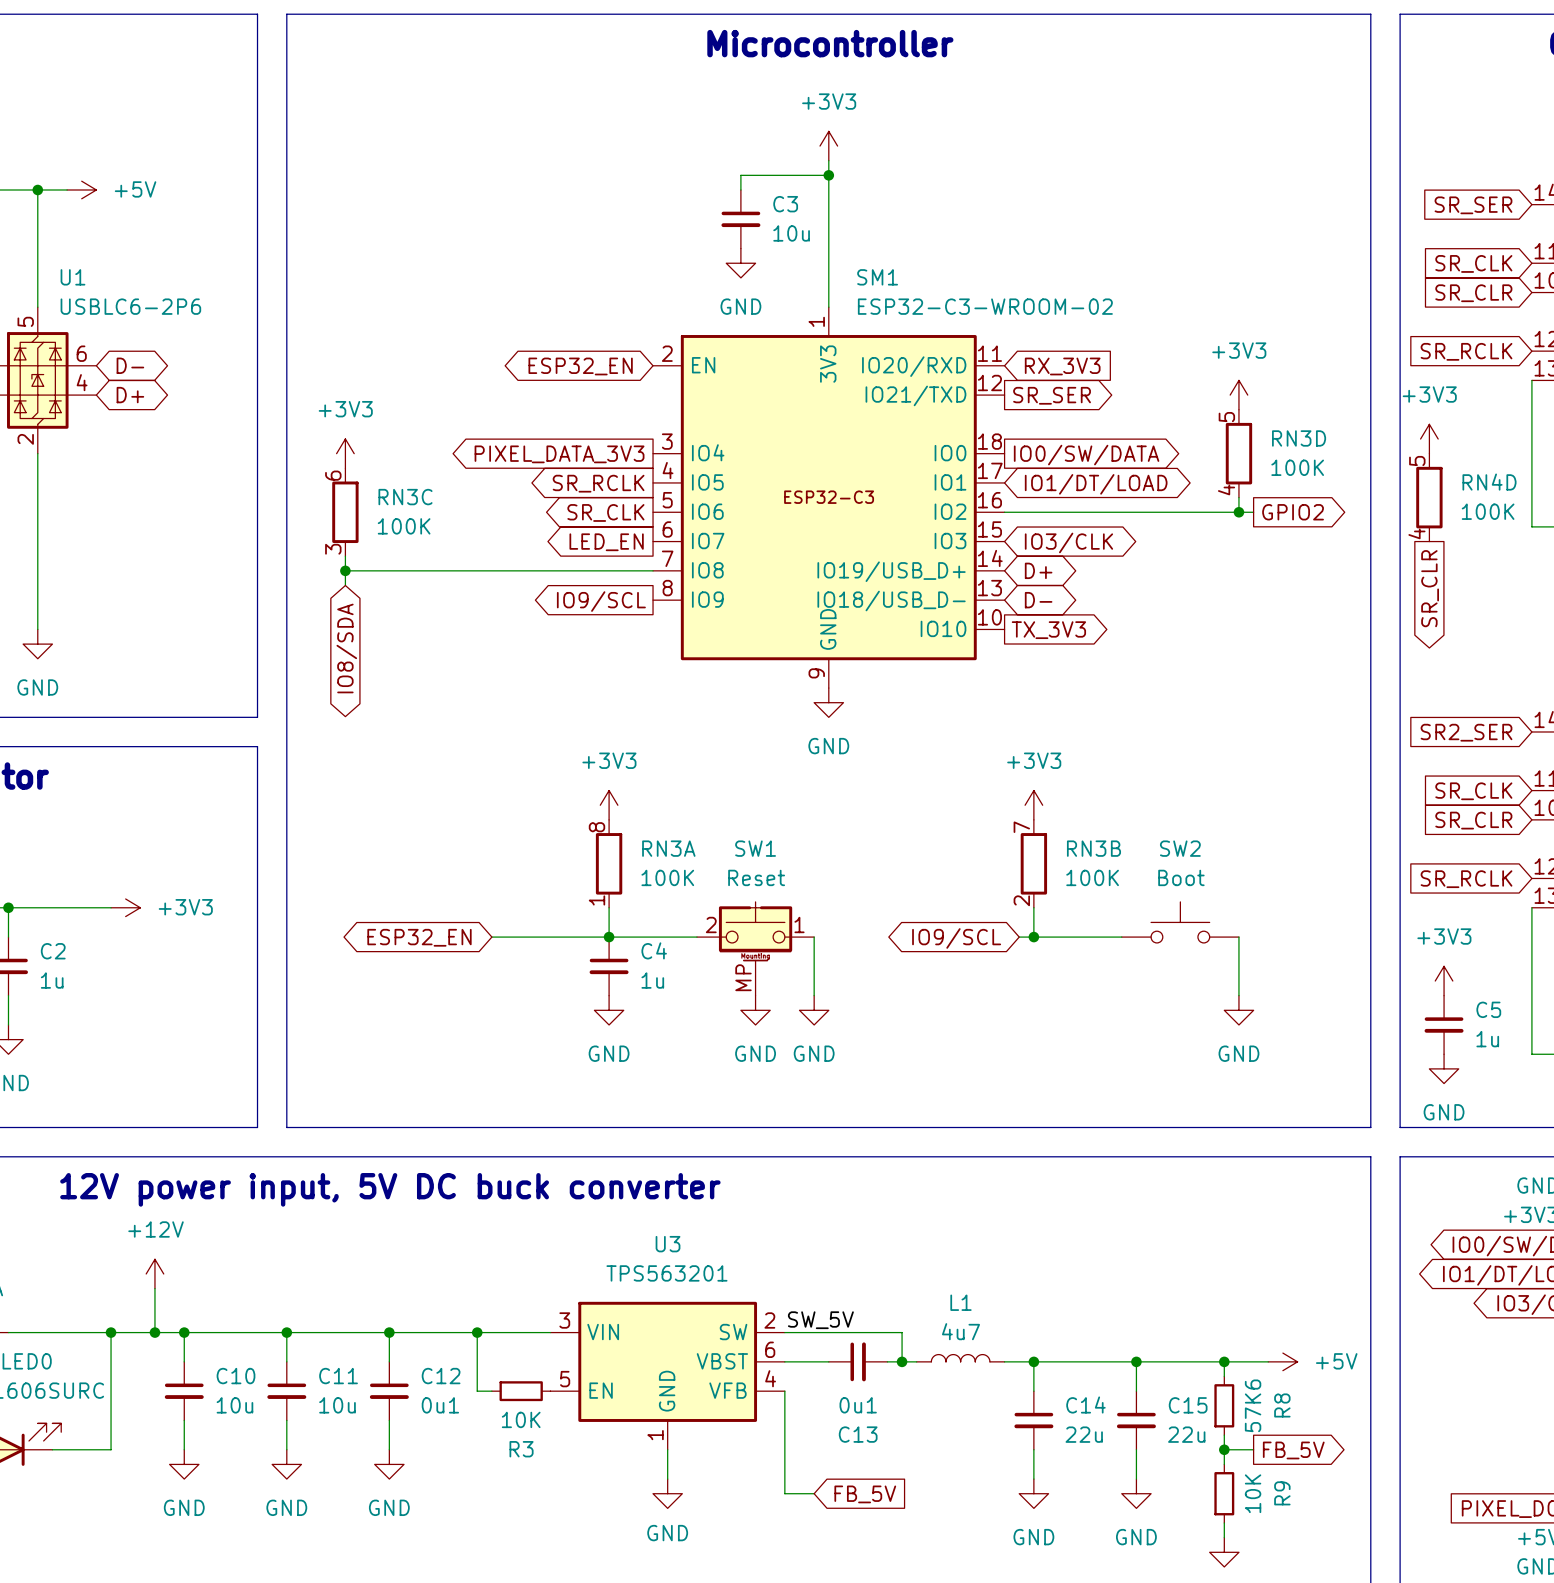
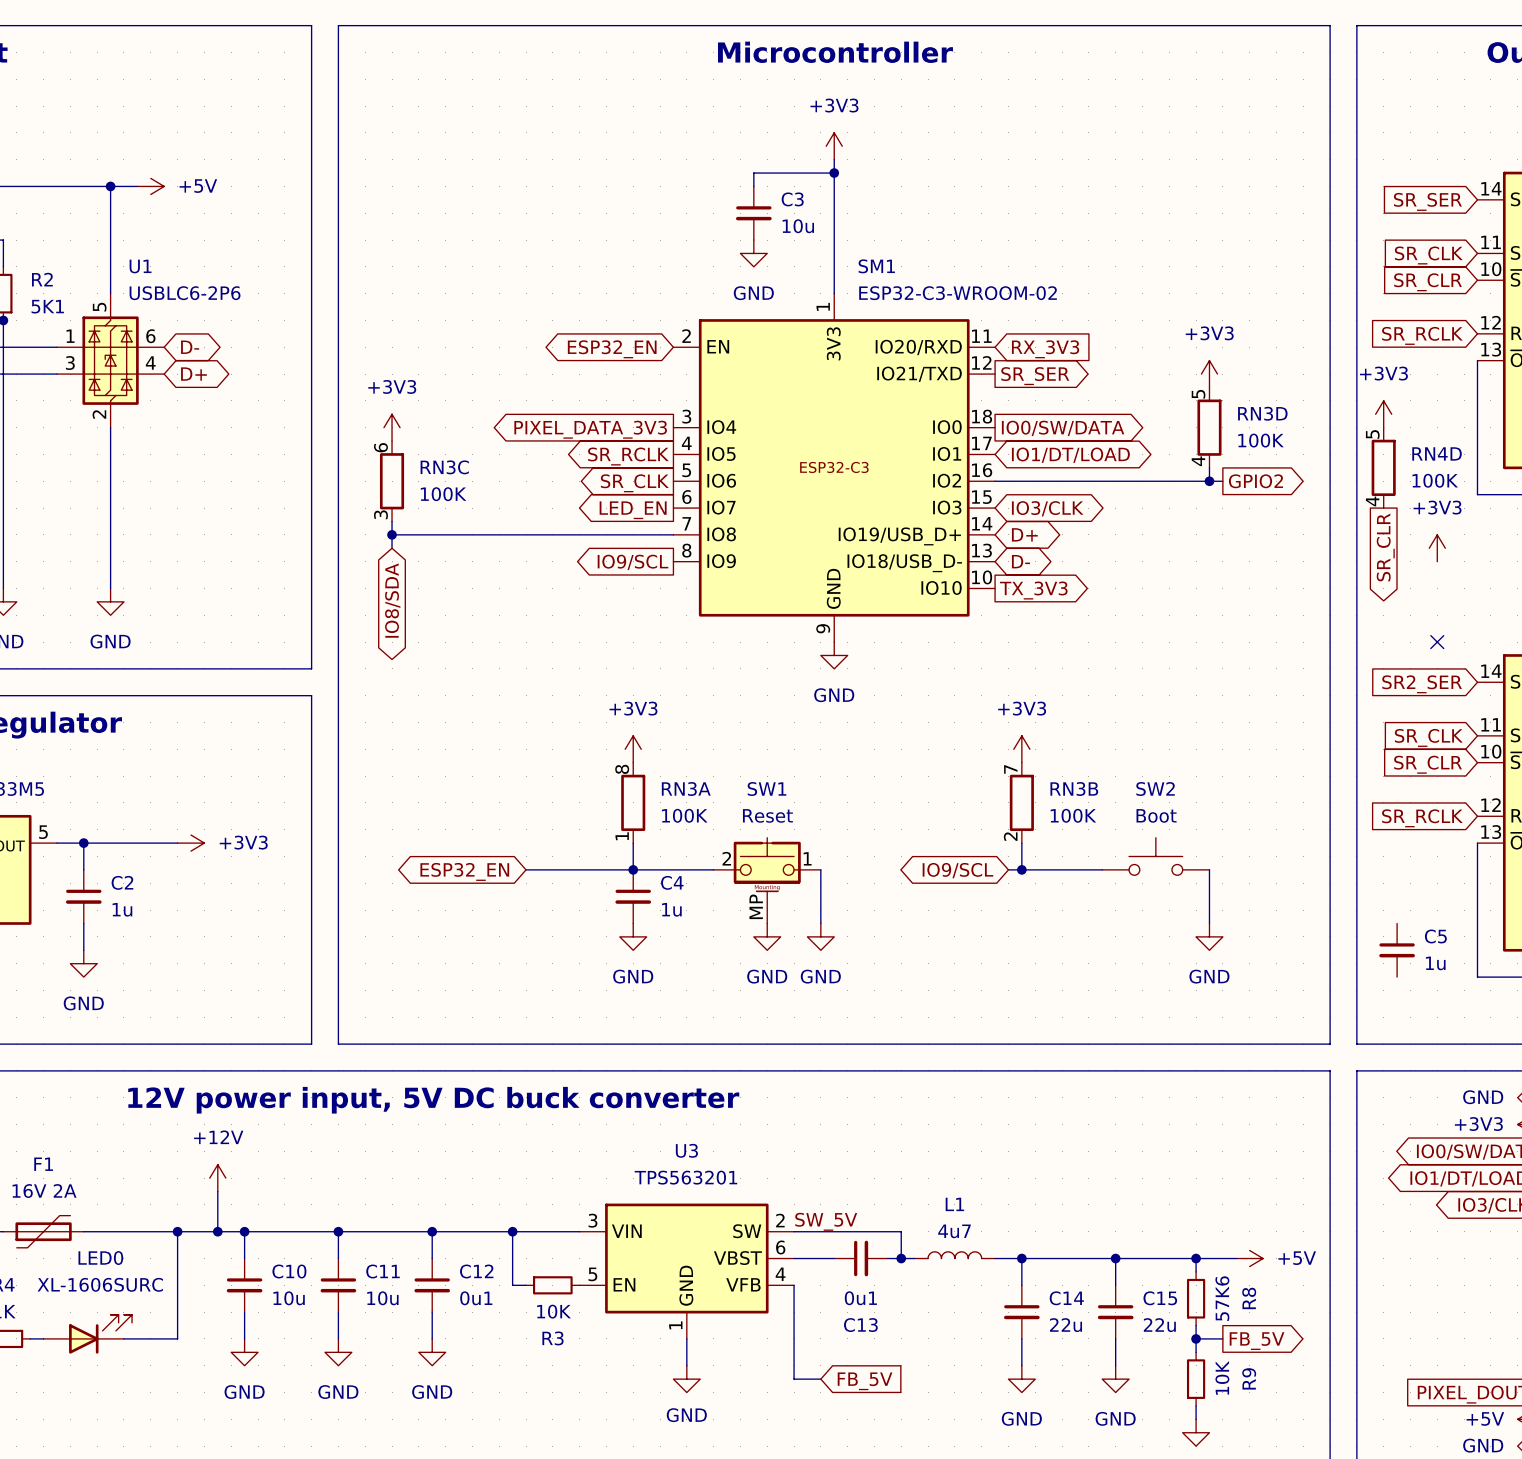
power symbol: none -> +3V3 (1437, 548)
no-connect mark: none -> (1437, 642)
power symbol: +3V3 (1444, 981) -> none
power symbol: GND (1444, 1068) -> none

